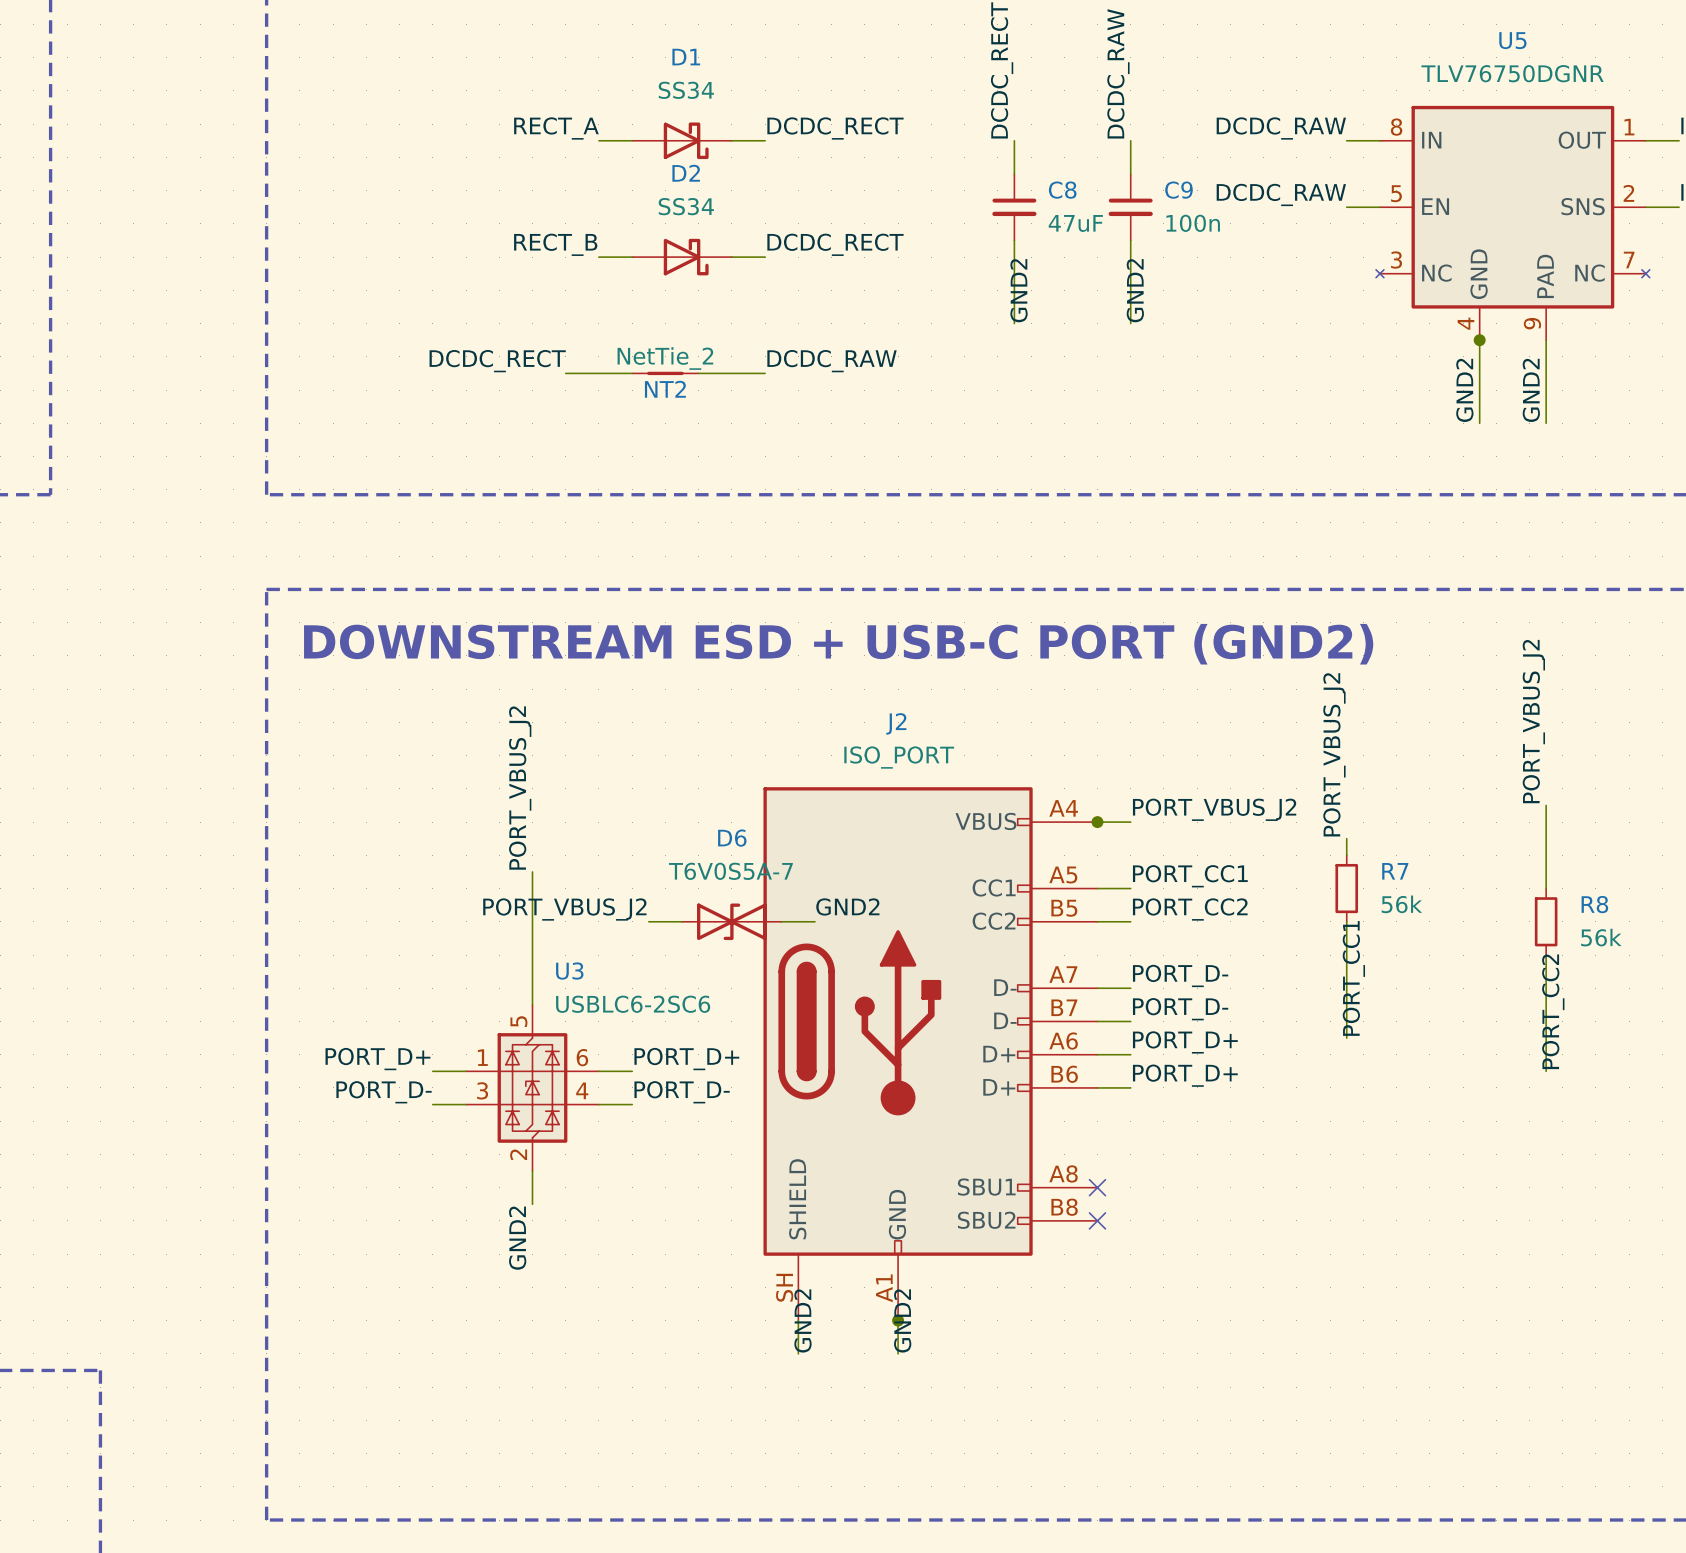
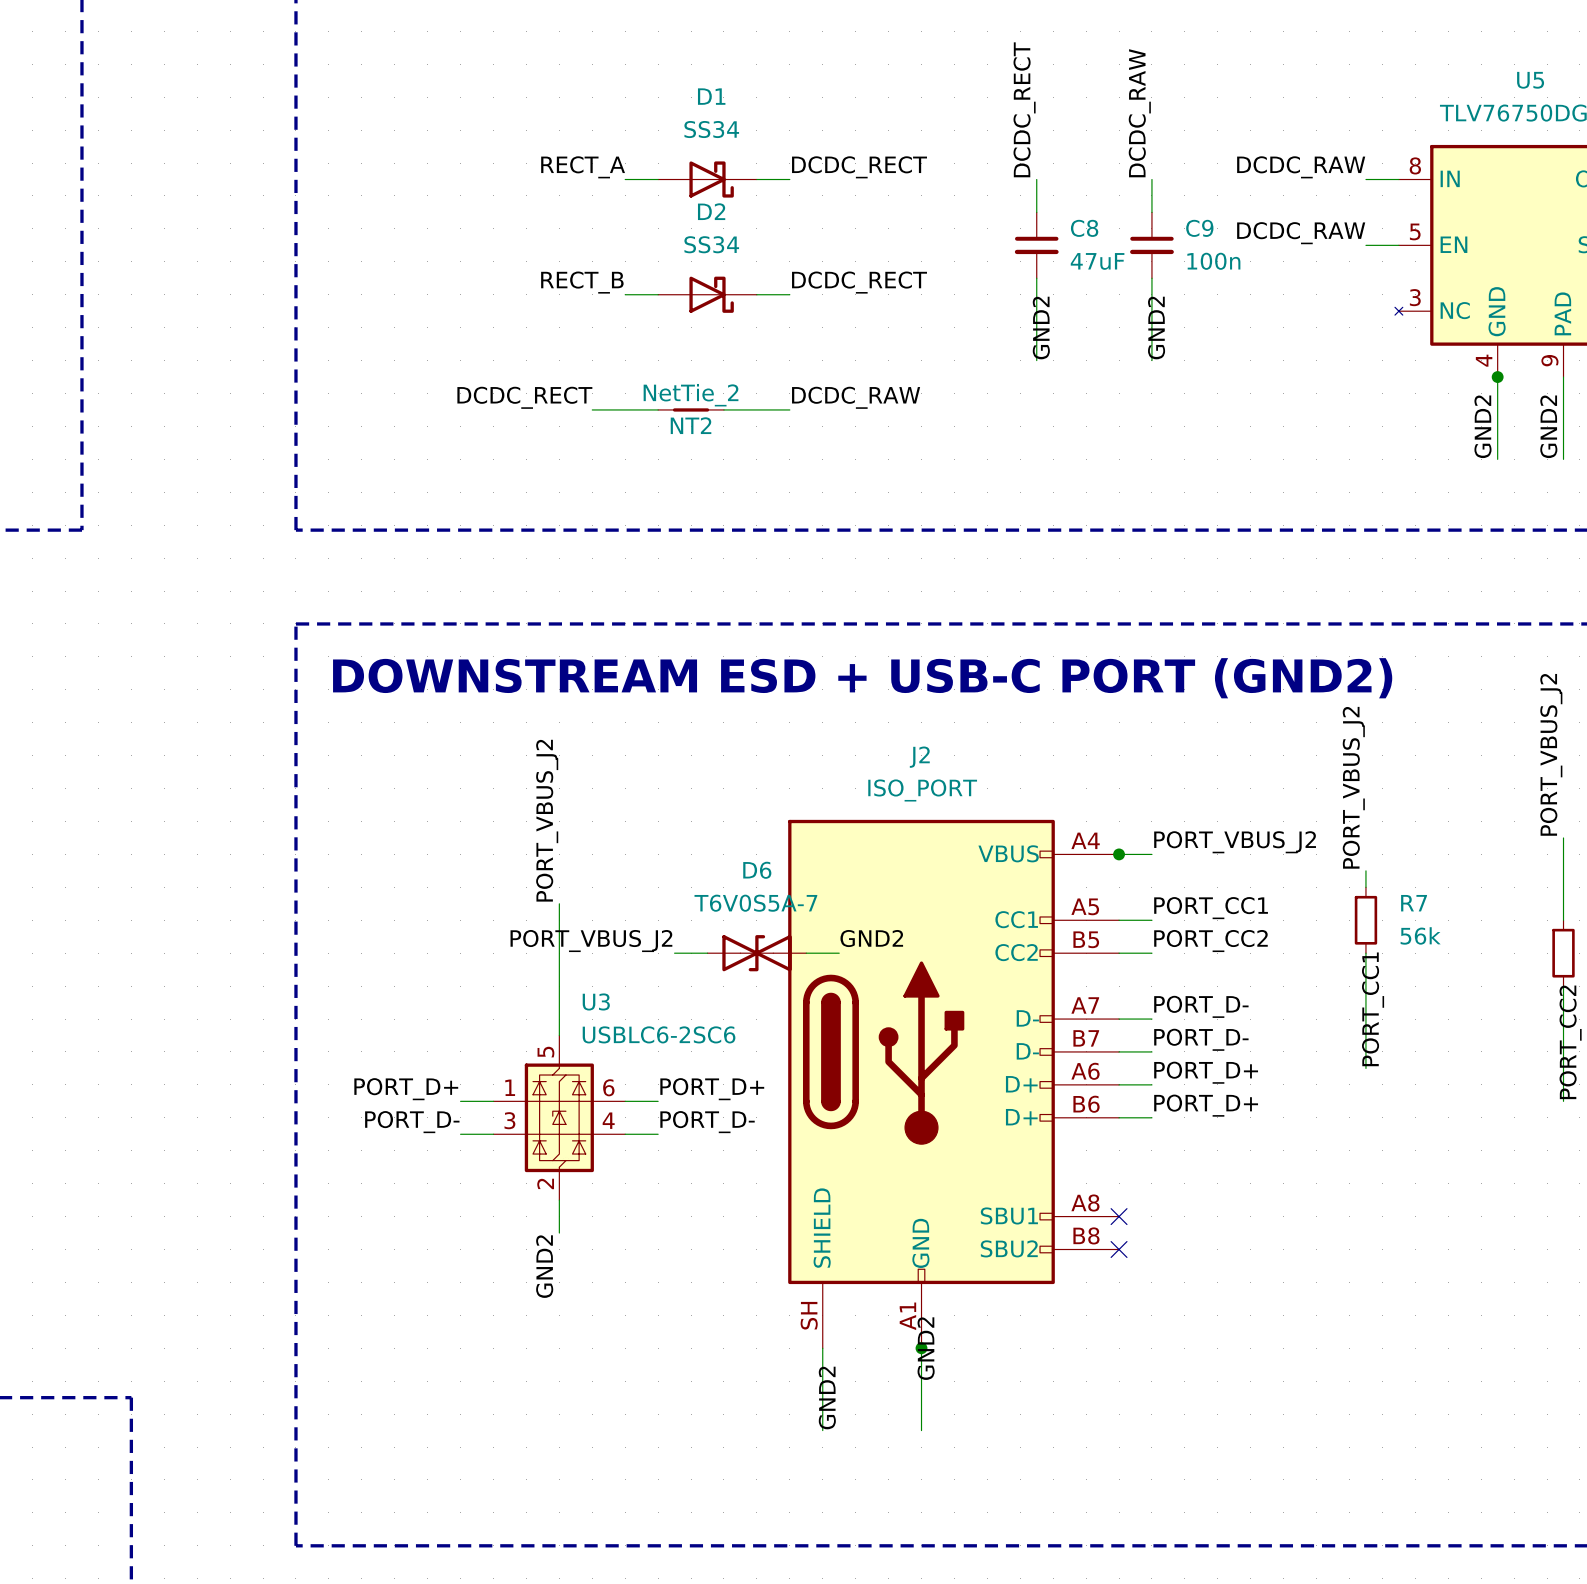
label position: GND2 (802, 1320) -> GND2 (827, 1398)
wire: none -> (822, 1381) (822, 1430)
wire: none -> (921, 1381) (921, 1430)

